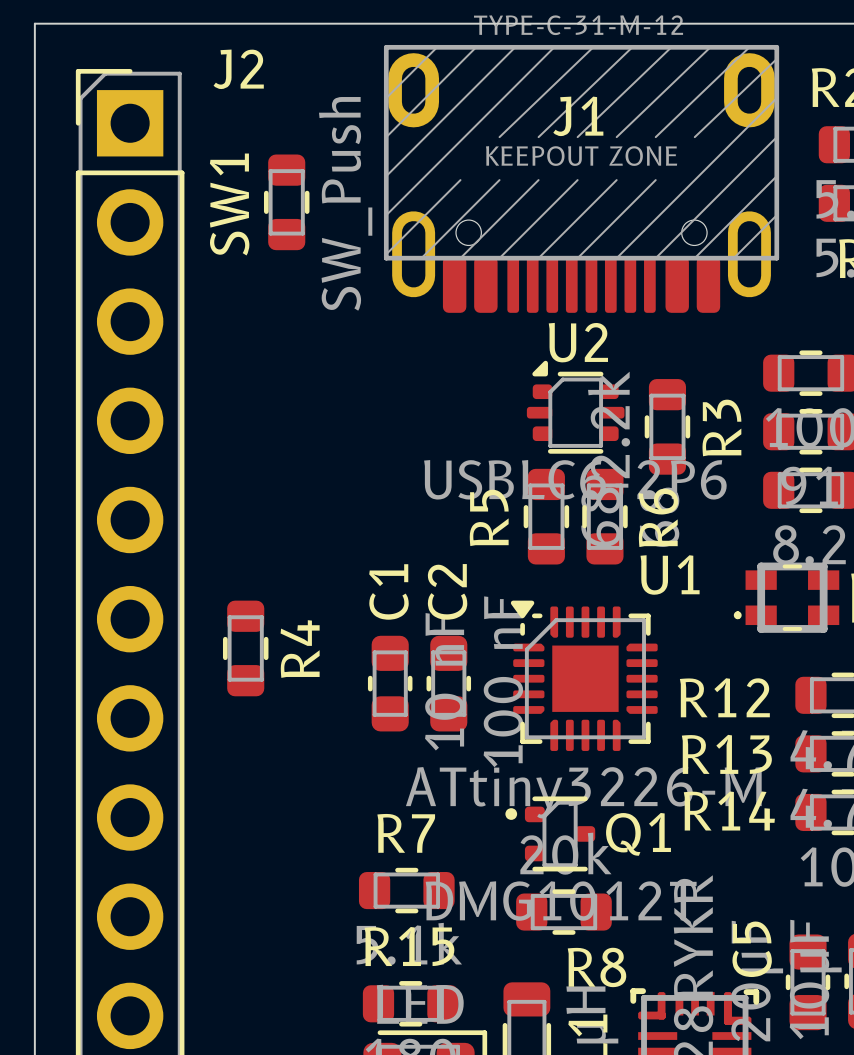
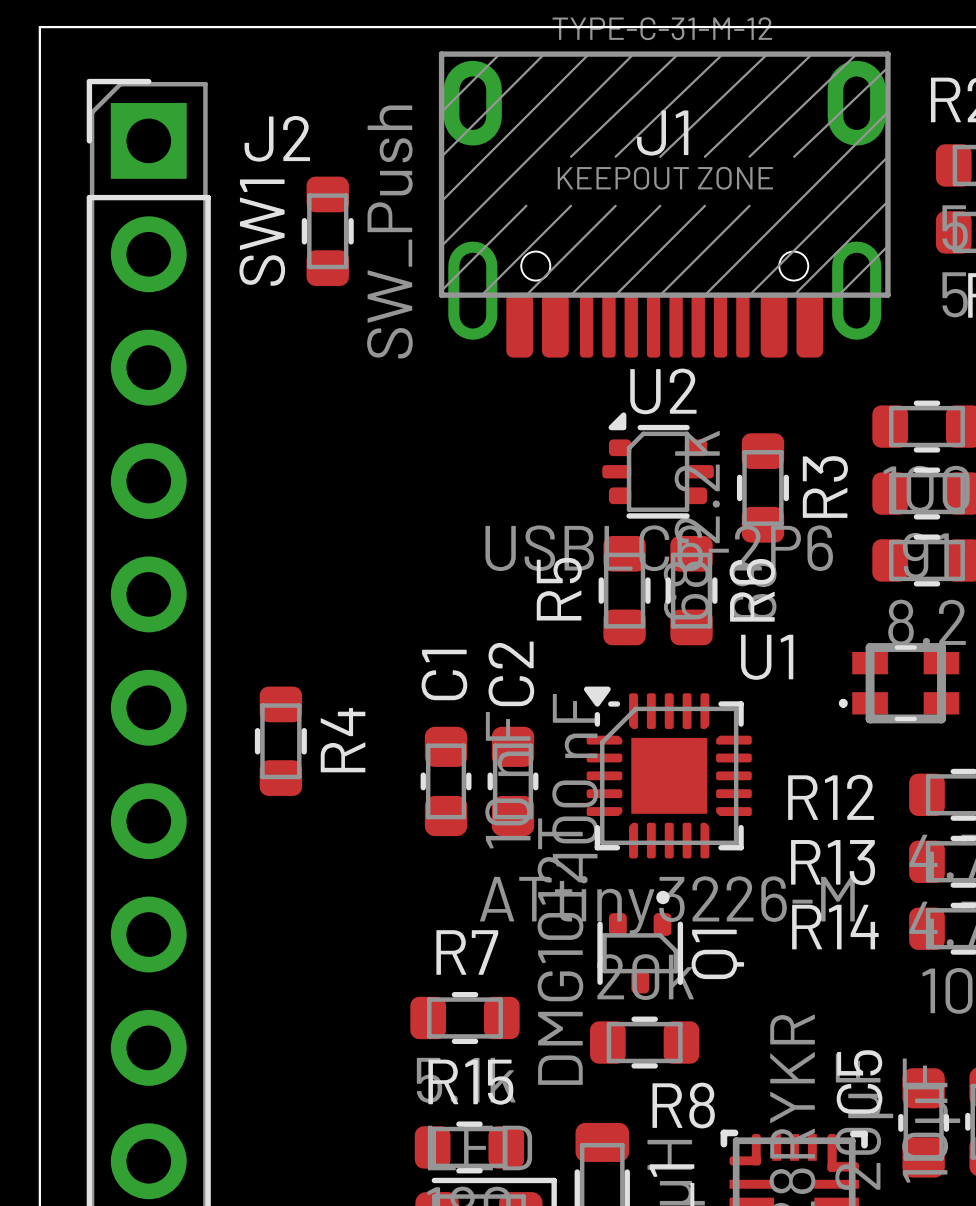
J2 name position: J2 (238, 69) -> J2 (277, 138)
Q1 rotation: 0° (550, 833) -> 90° clockwise (640, 942)

